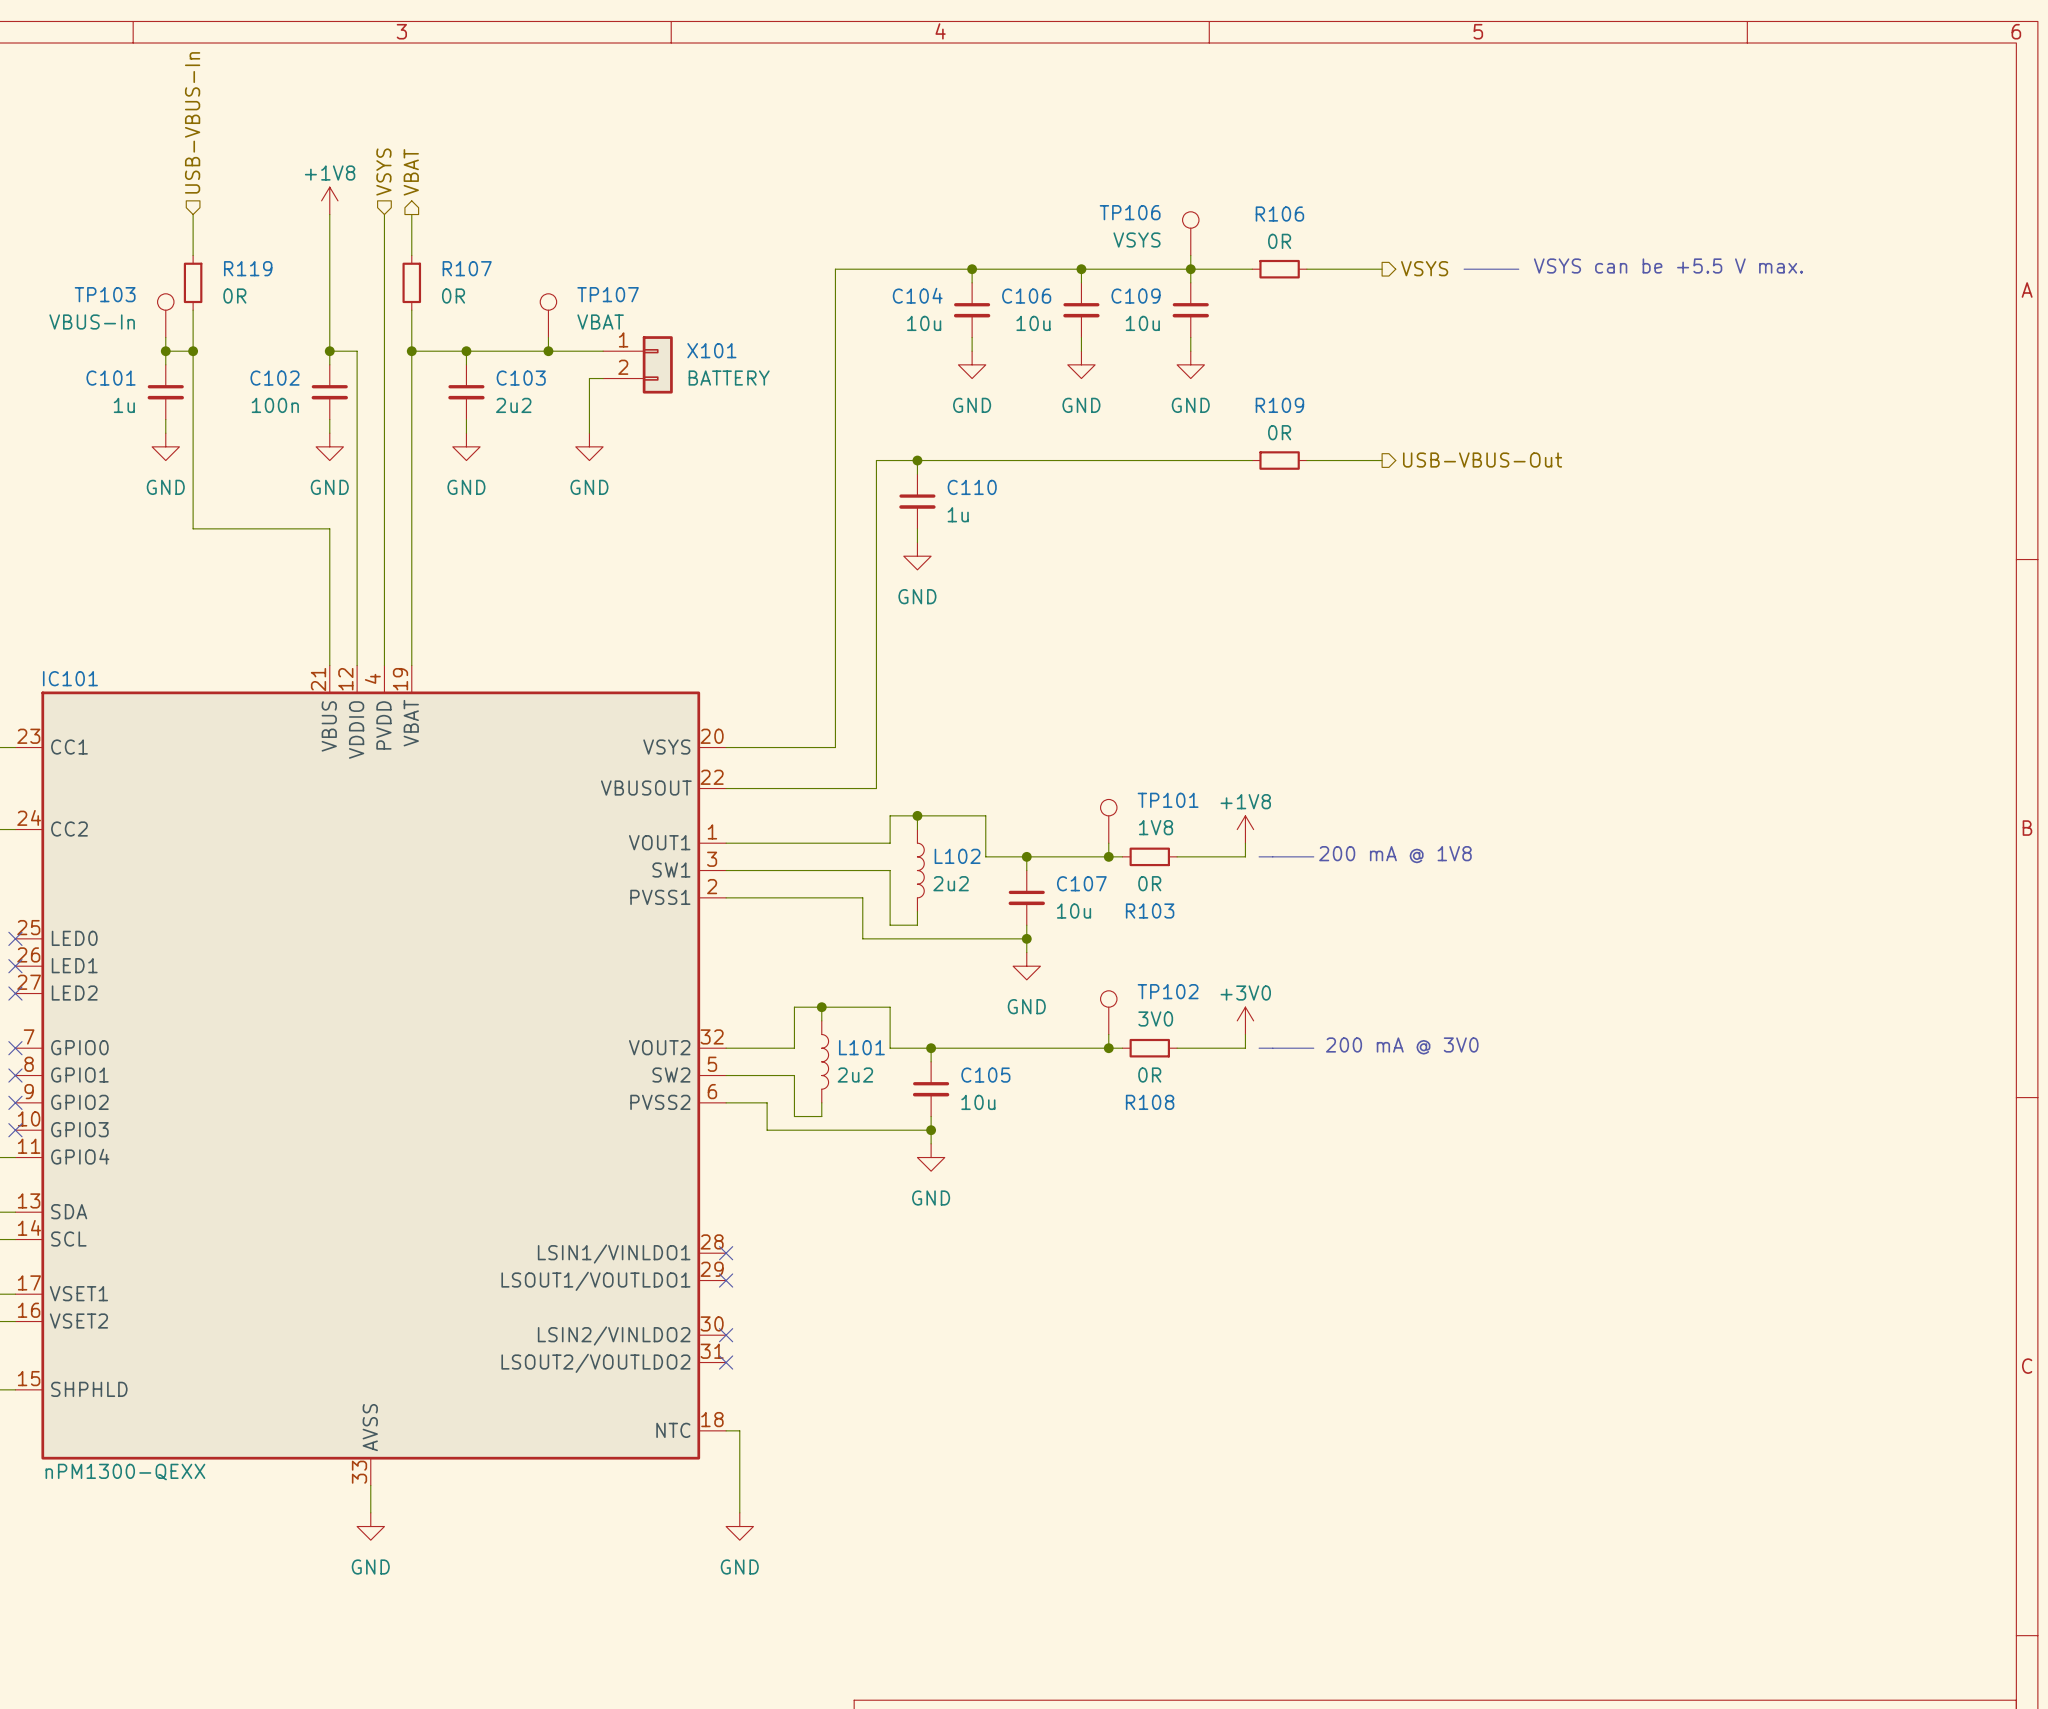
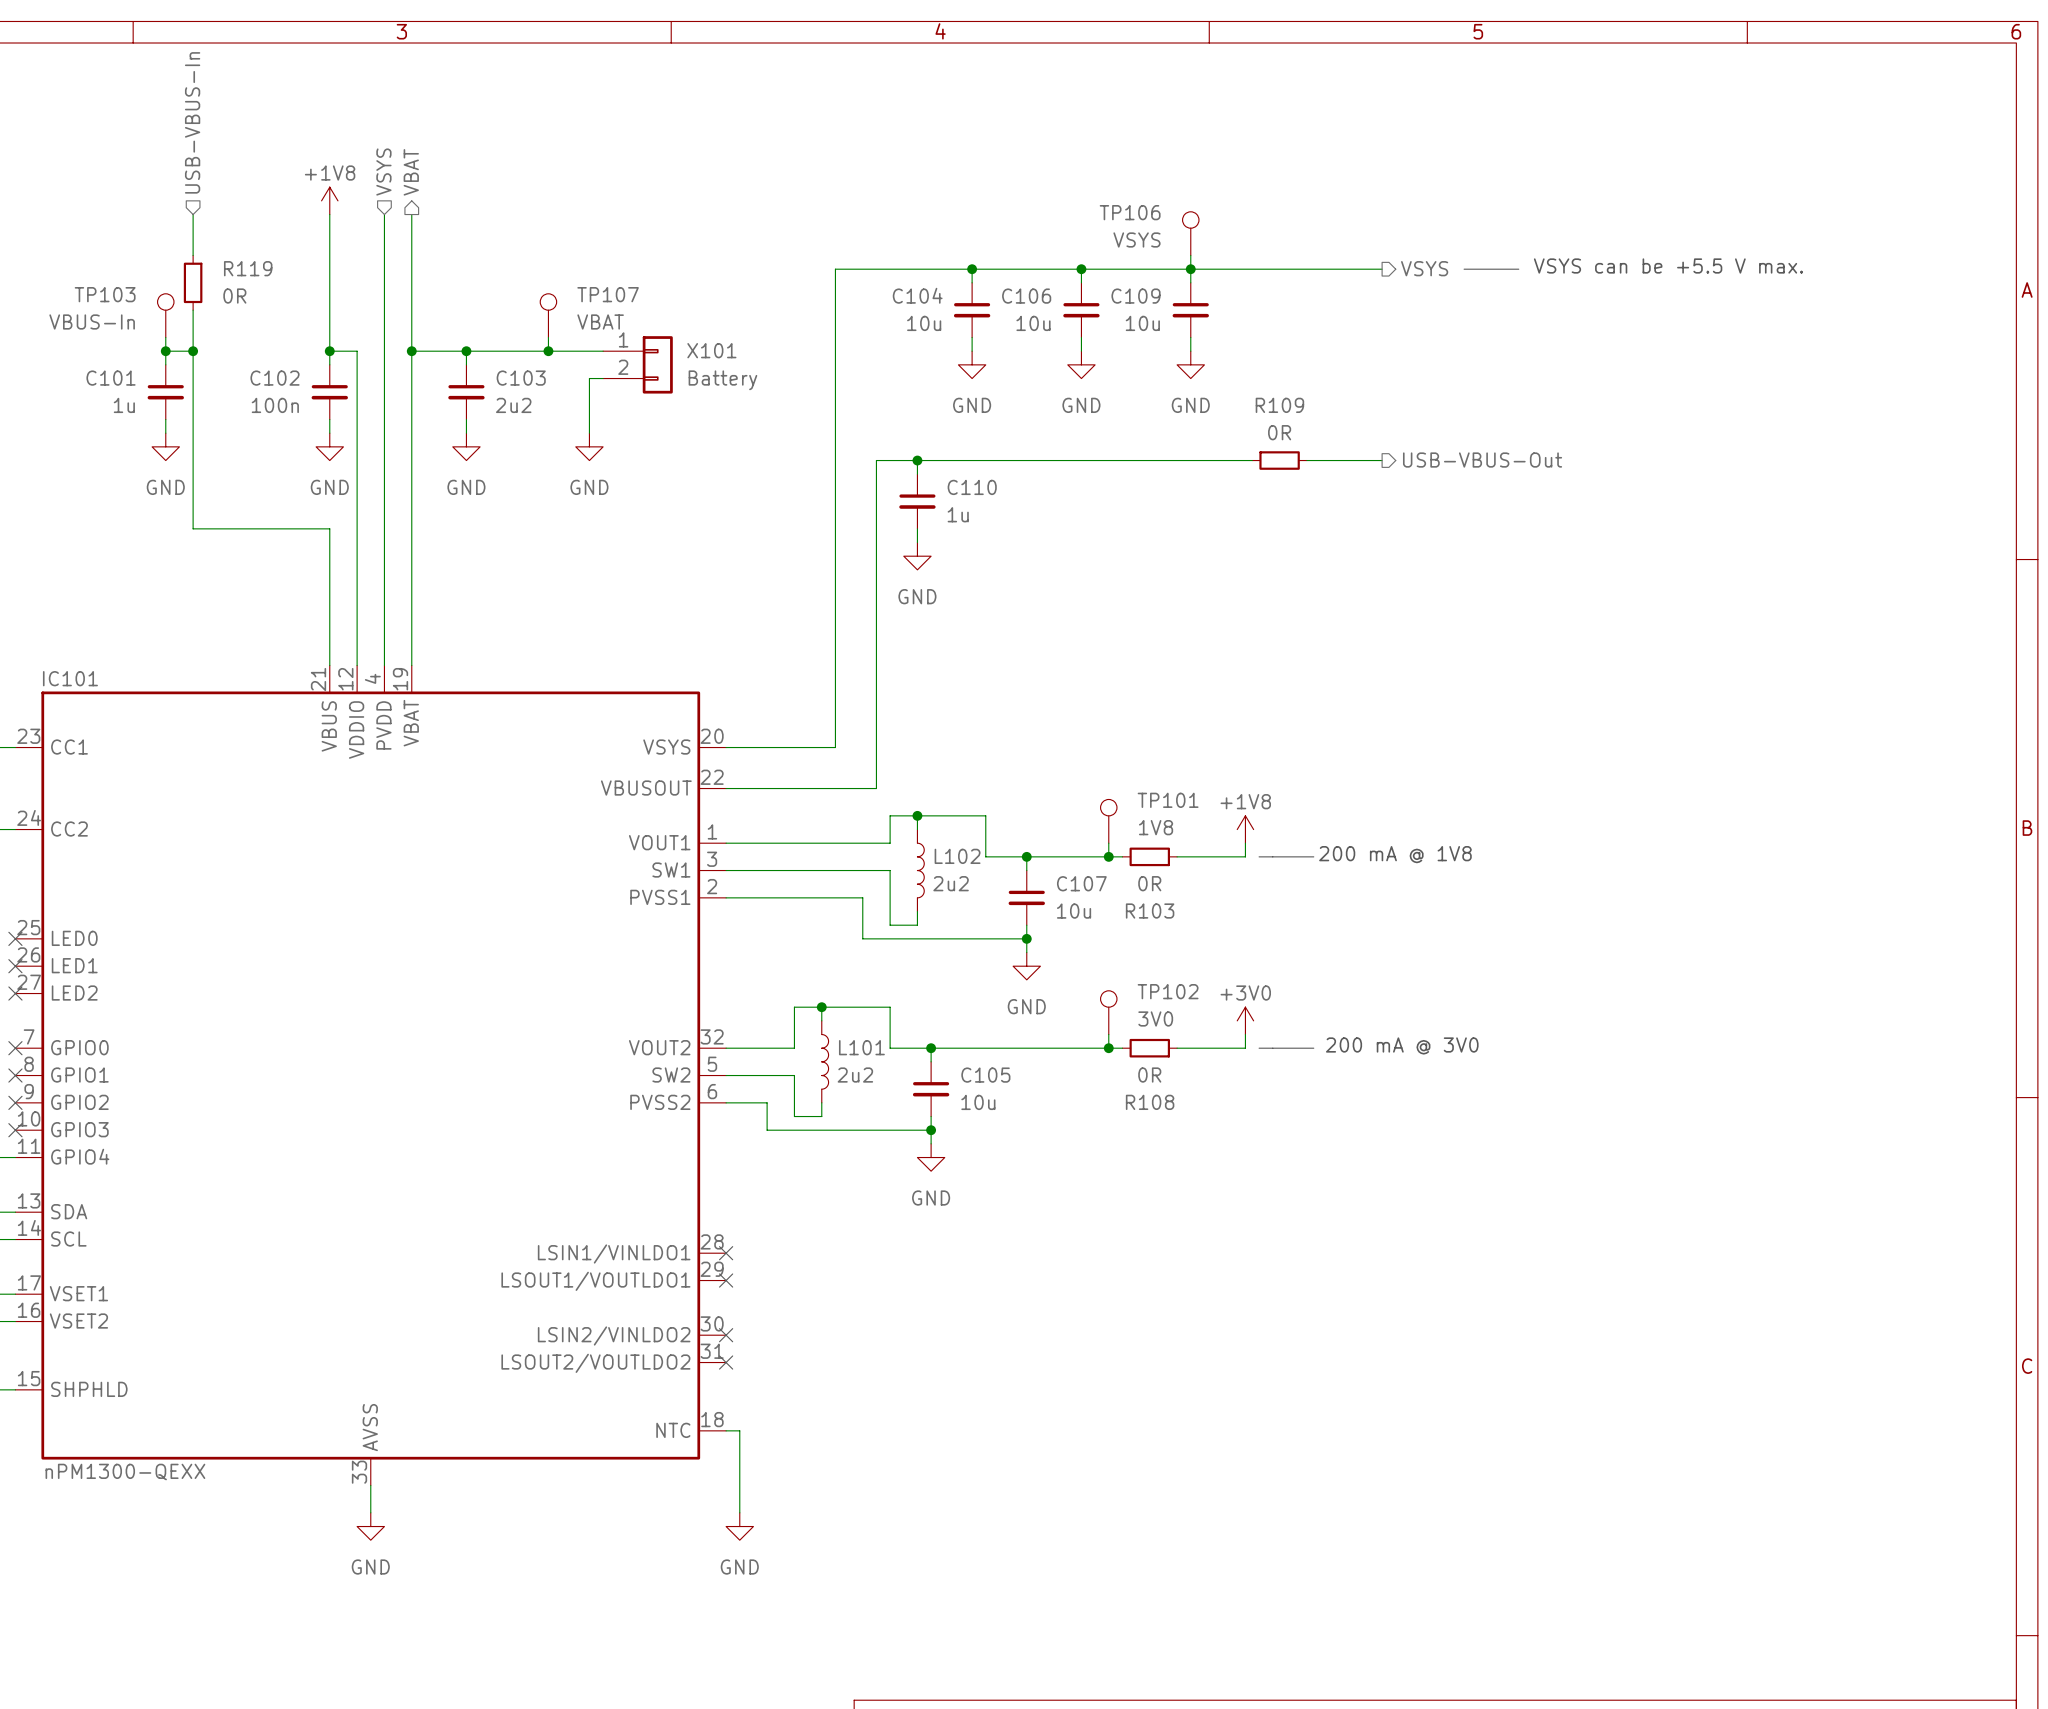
wire: none -> (411, 255) (411, 310)
wire: none -> (1252, 269) (1306, 269)
R106: 0R (1279, 269) -> none
R107: 0R (411, 282) -> none
X101 value: BATTERY (729, 378) -> Battery (722, 380)

